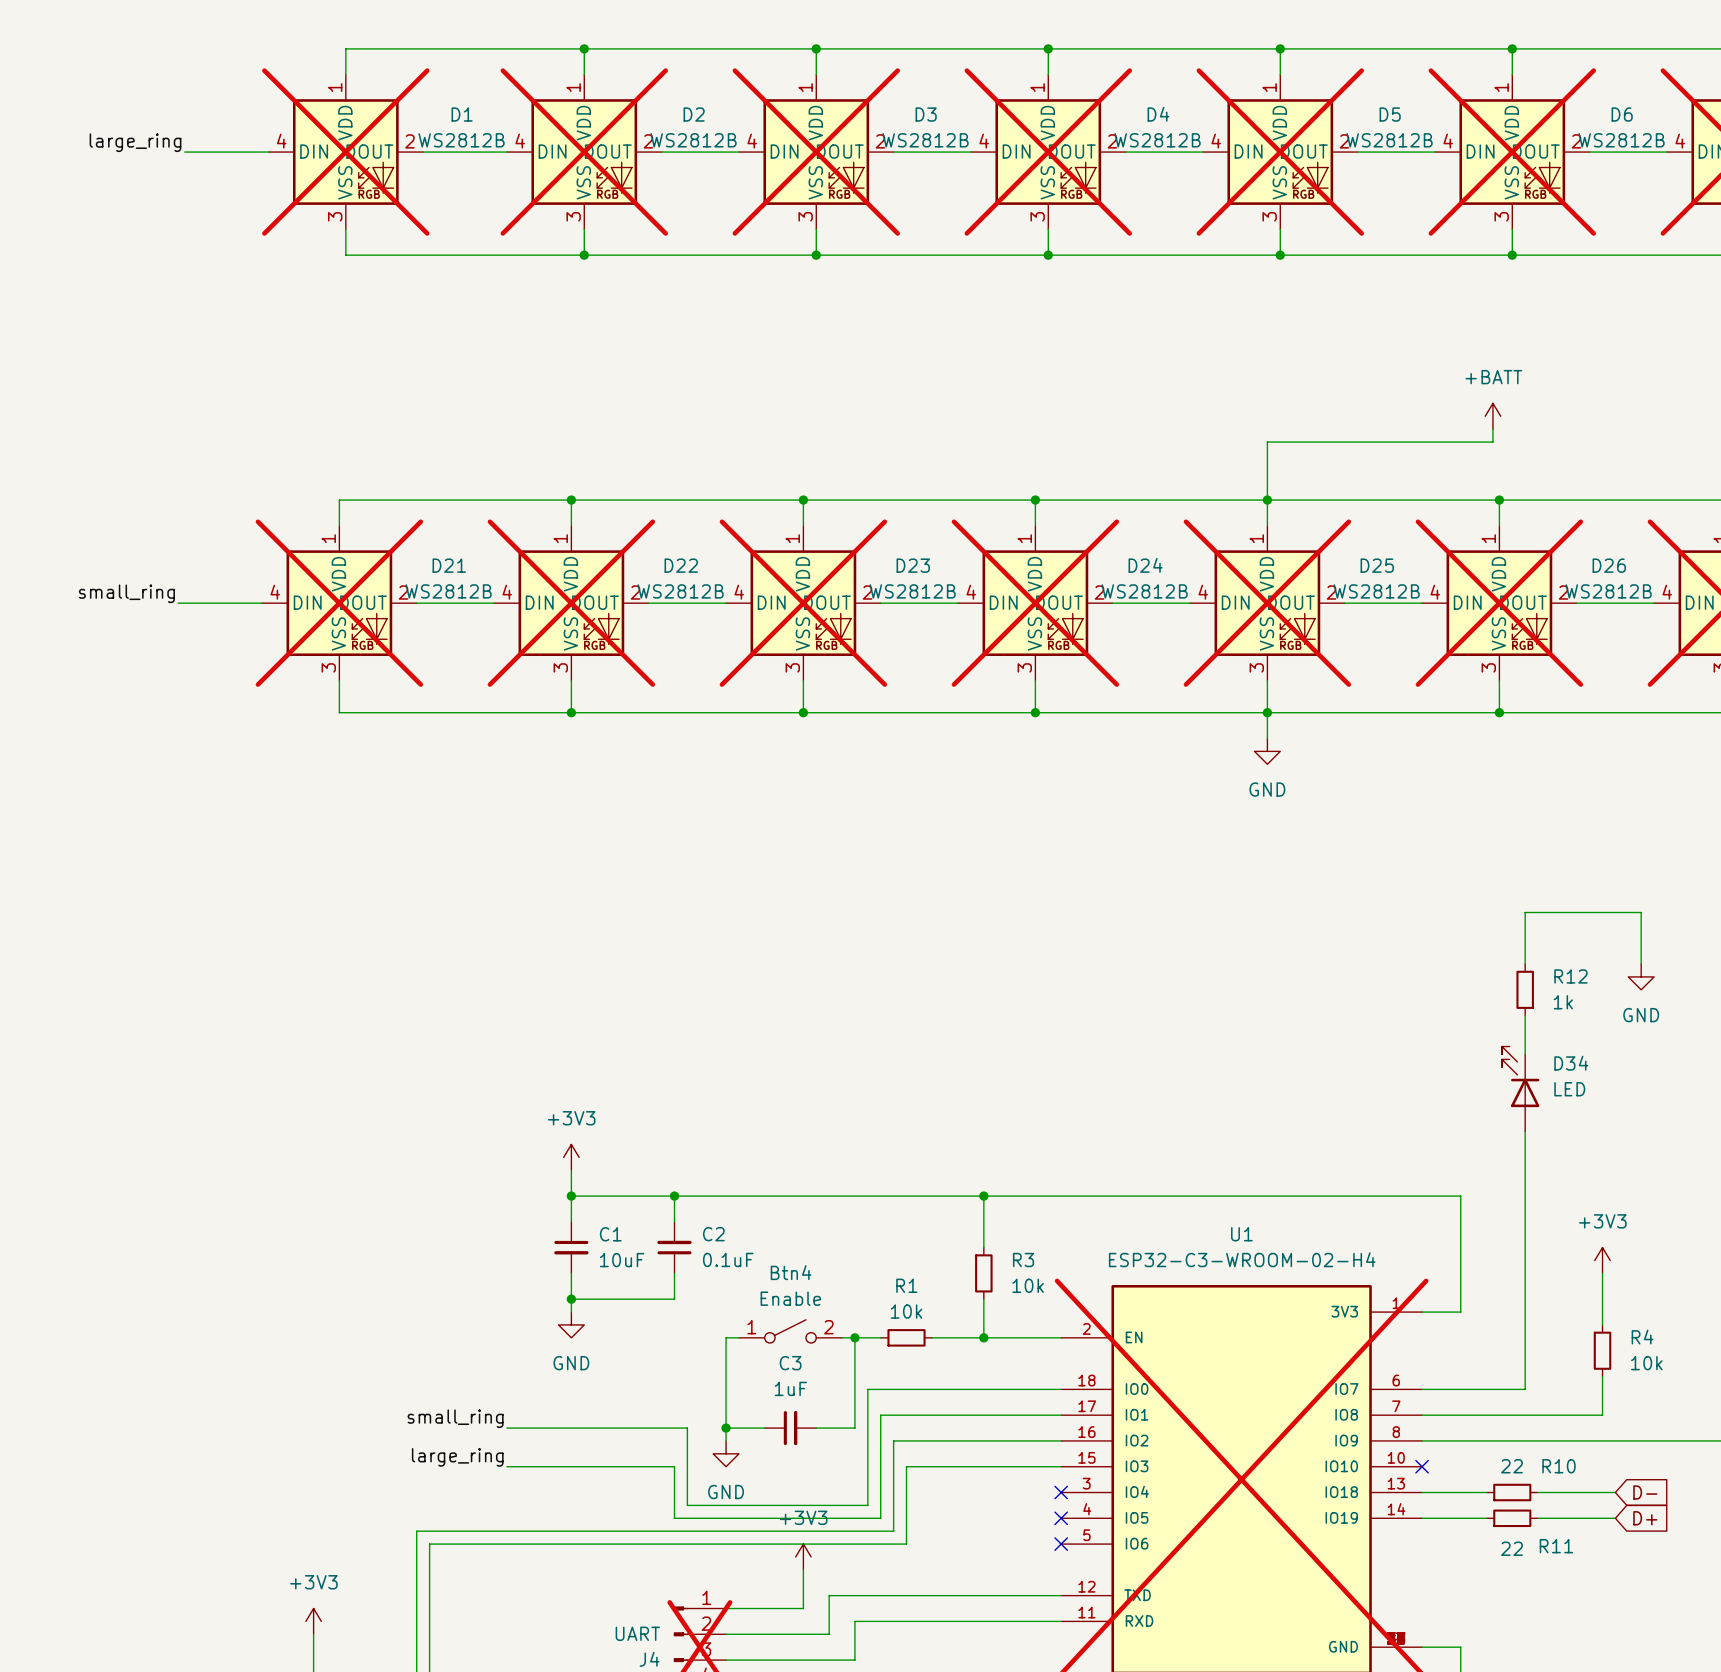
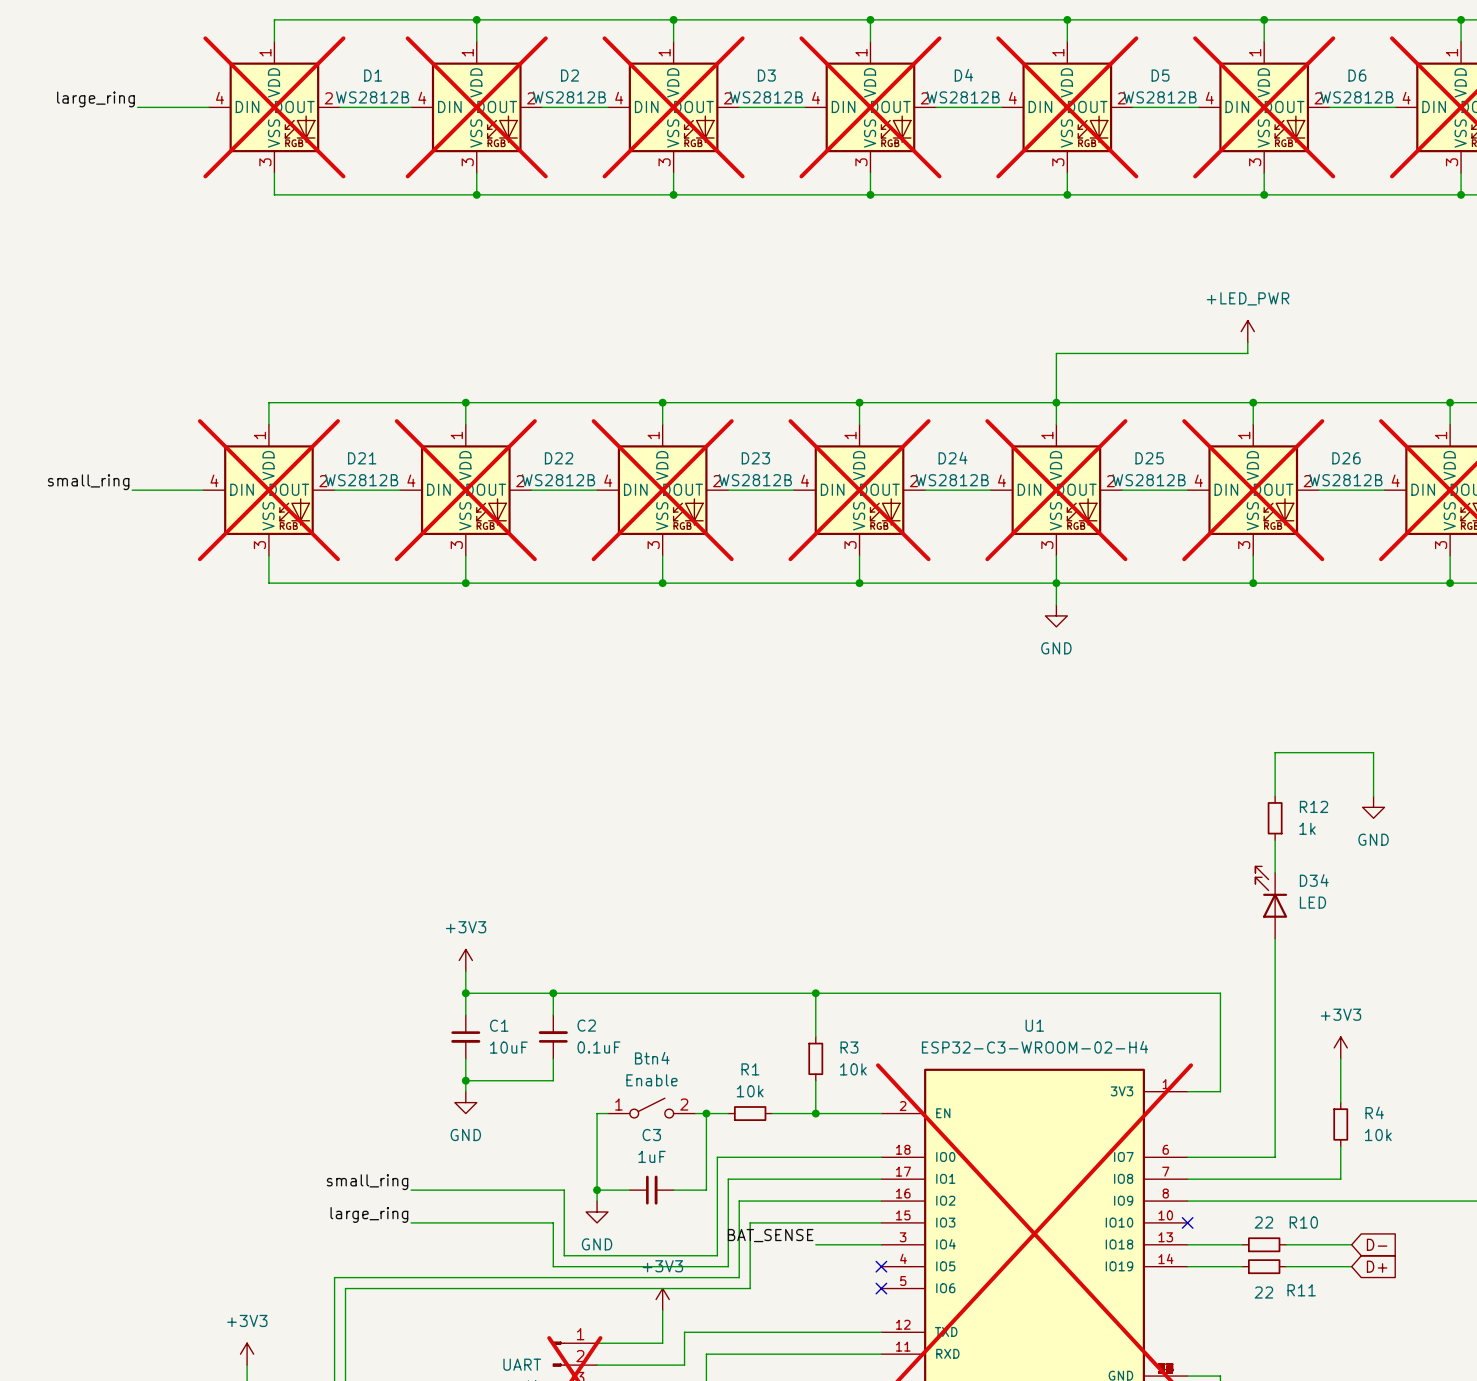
power symbol: +BATT (1492, 416) -> +LED_PWR (1247, 331)
label: none -> BAT_SENSE (770, 1235)
wire: none -> (815, 1244) (881, 1244)
no-connect mark: (1061, 1492) -> none

